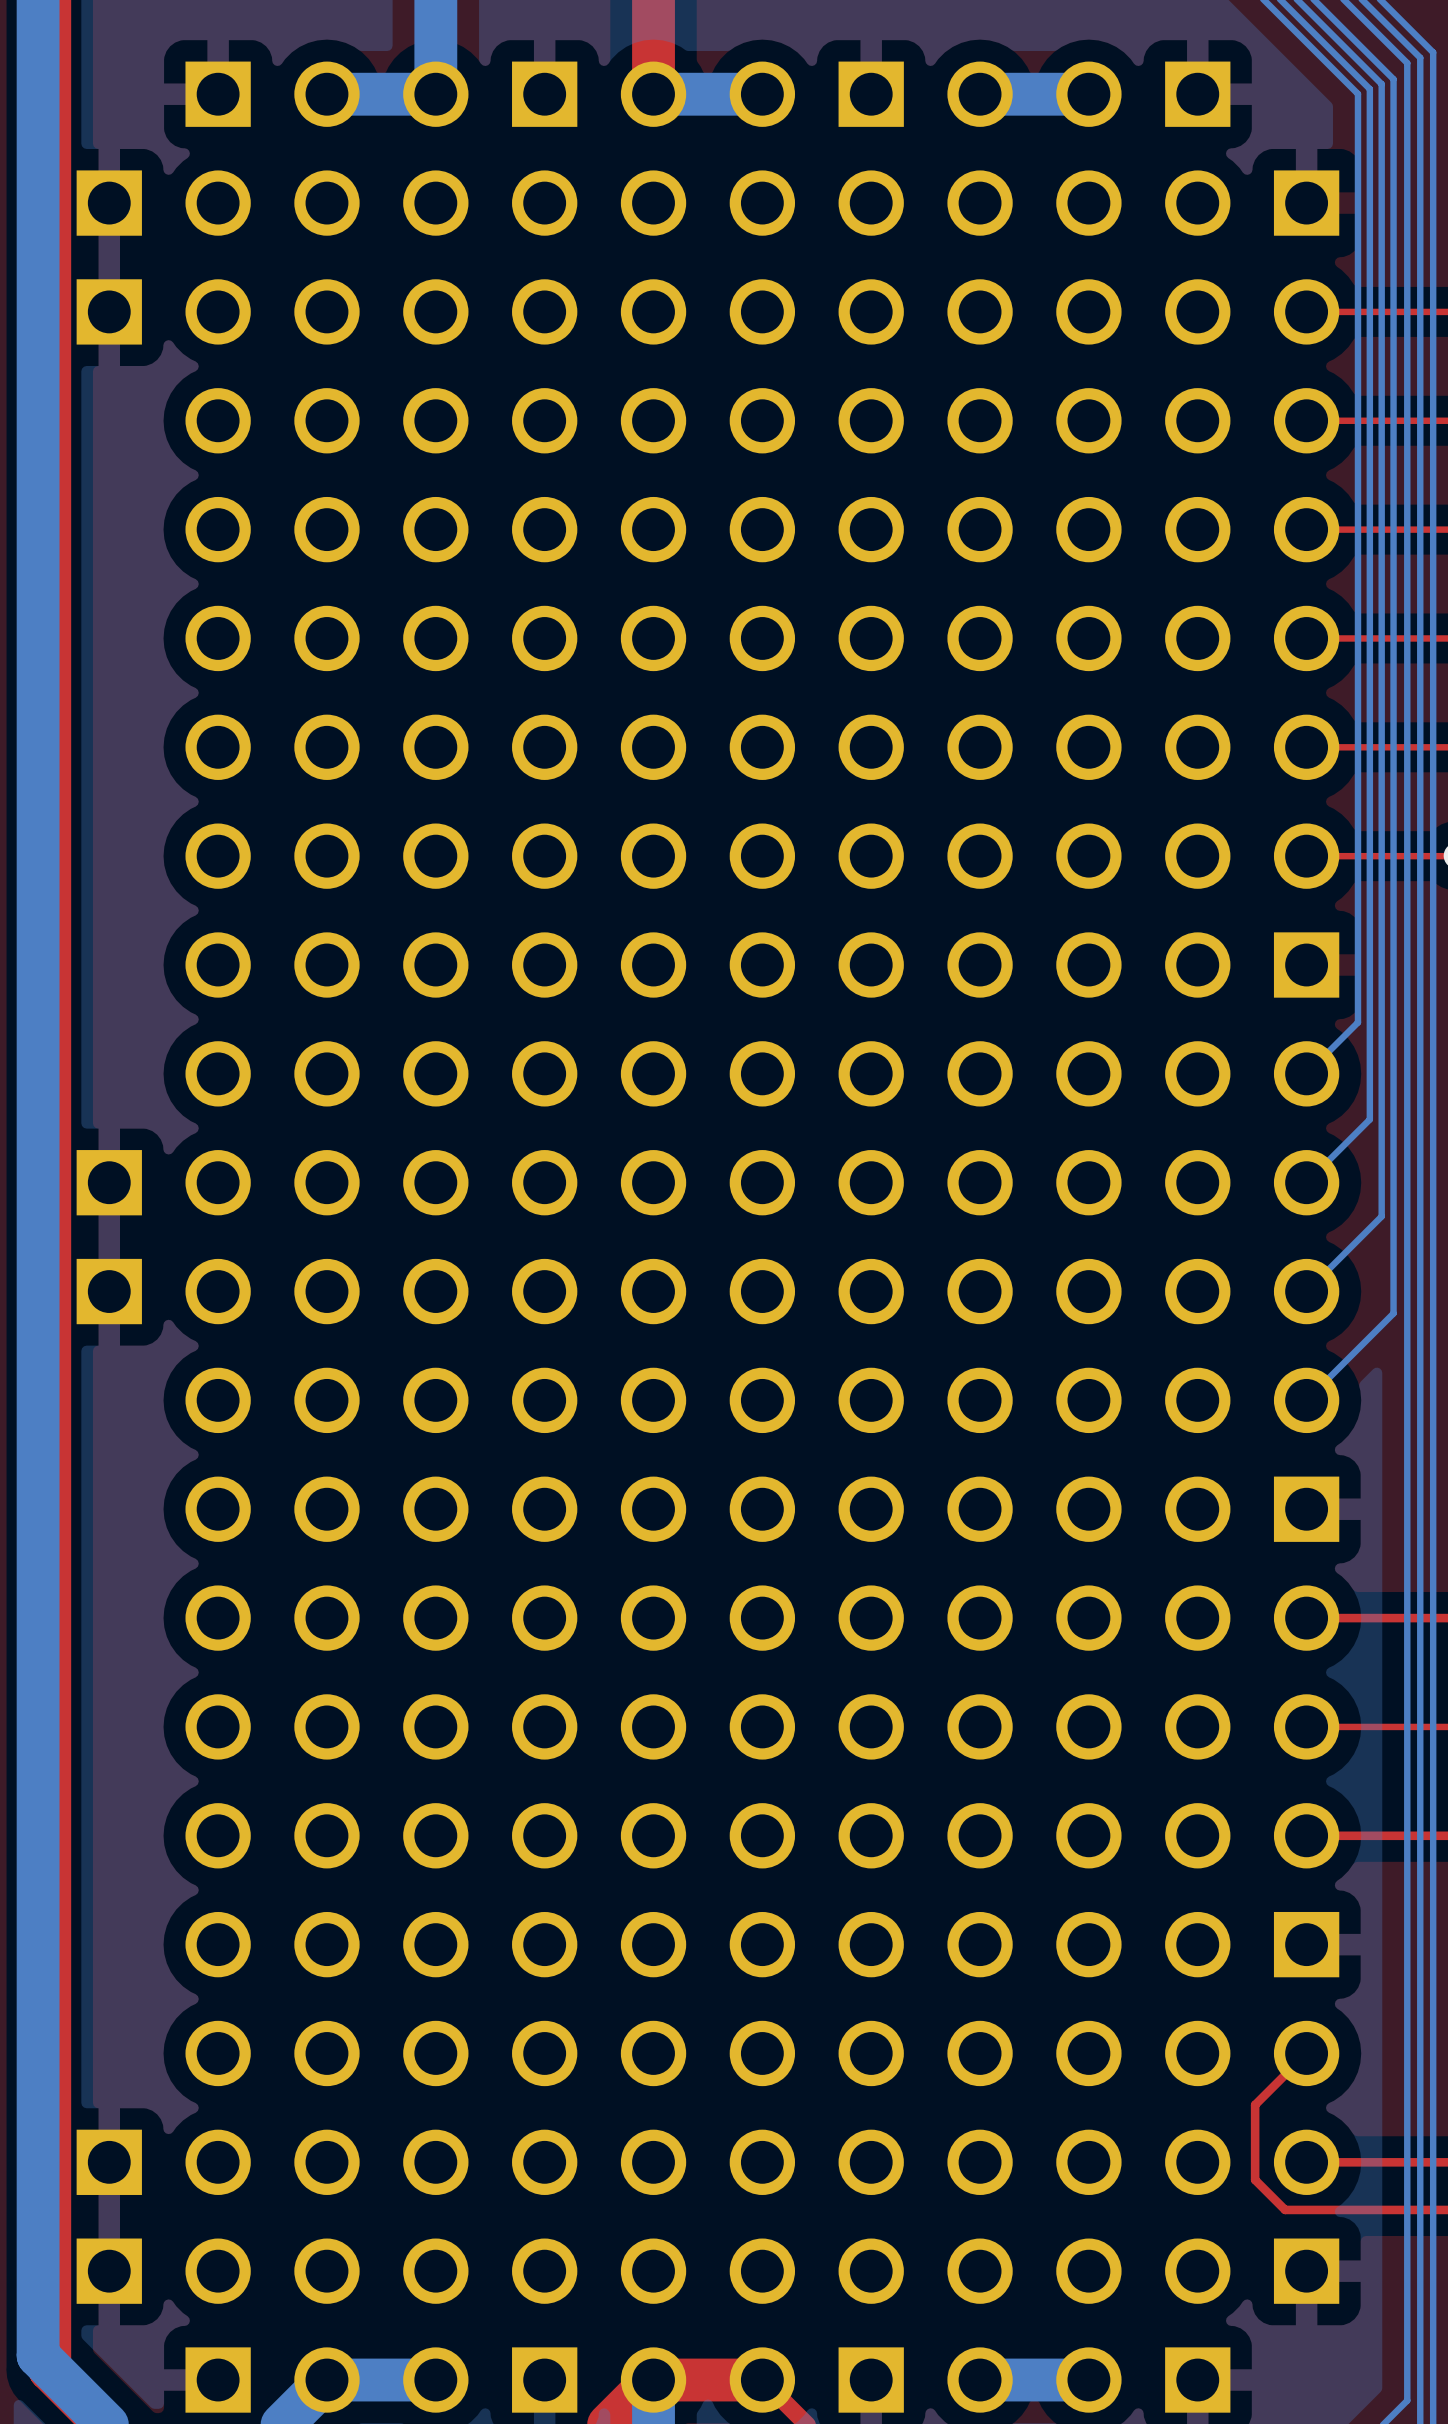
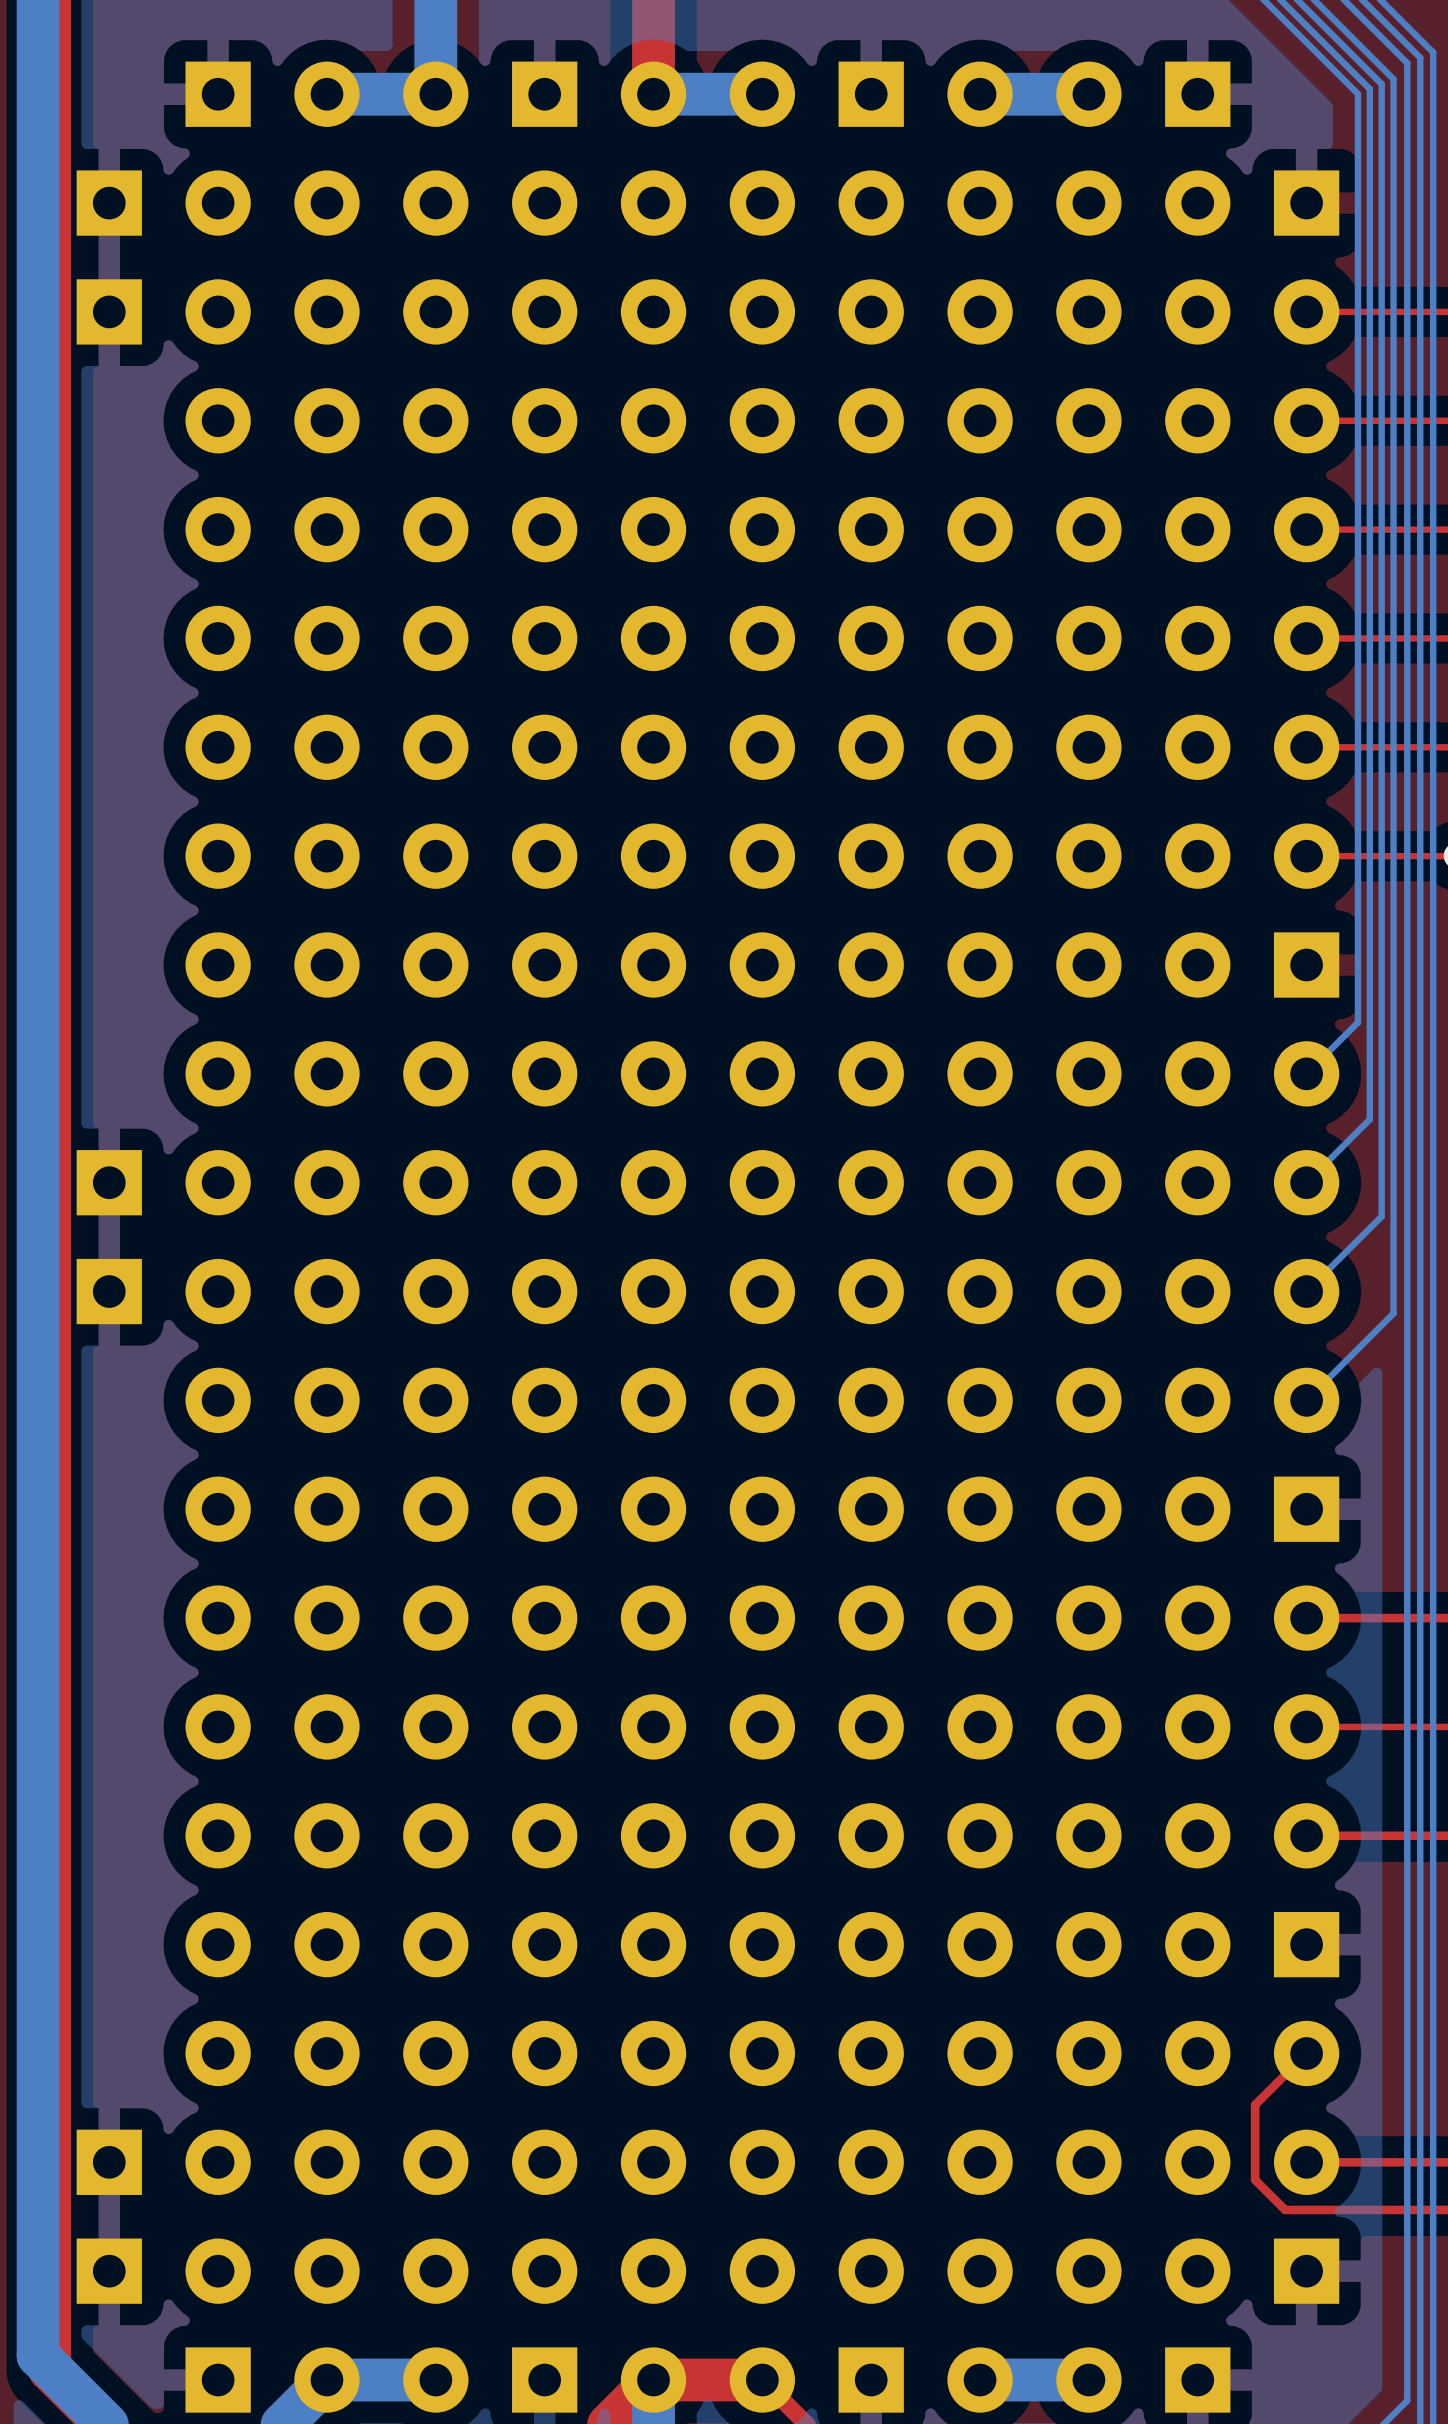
part footprint: [76, 61, 1340, 2413] -> [76, 61, 1340, 2413]

